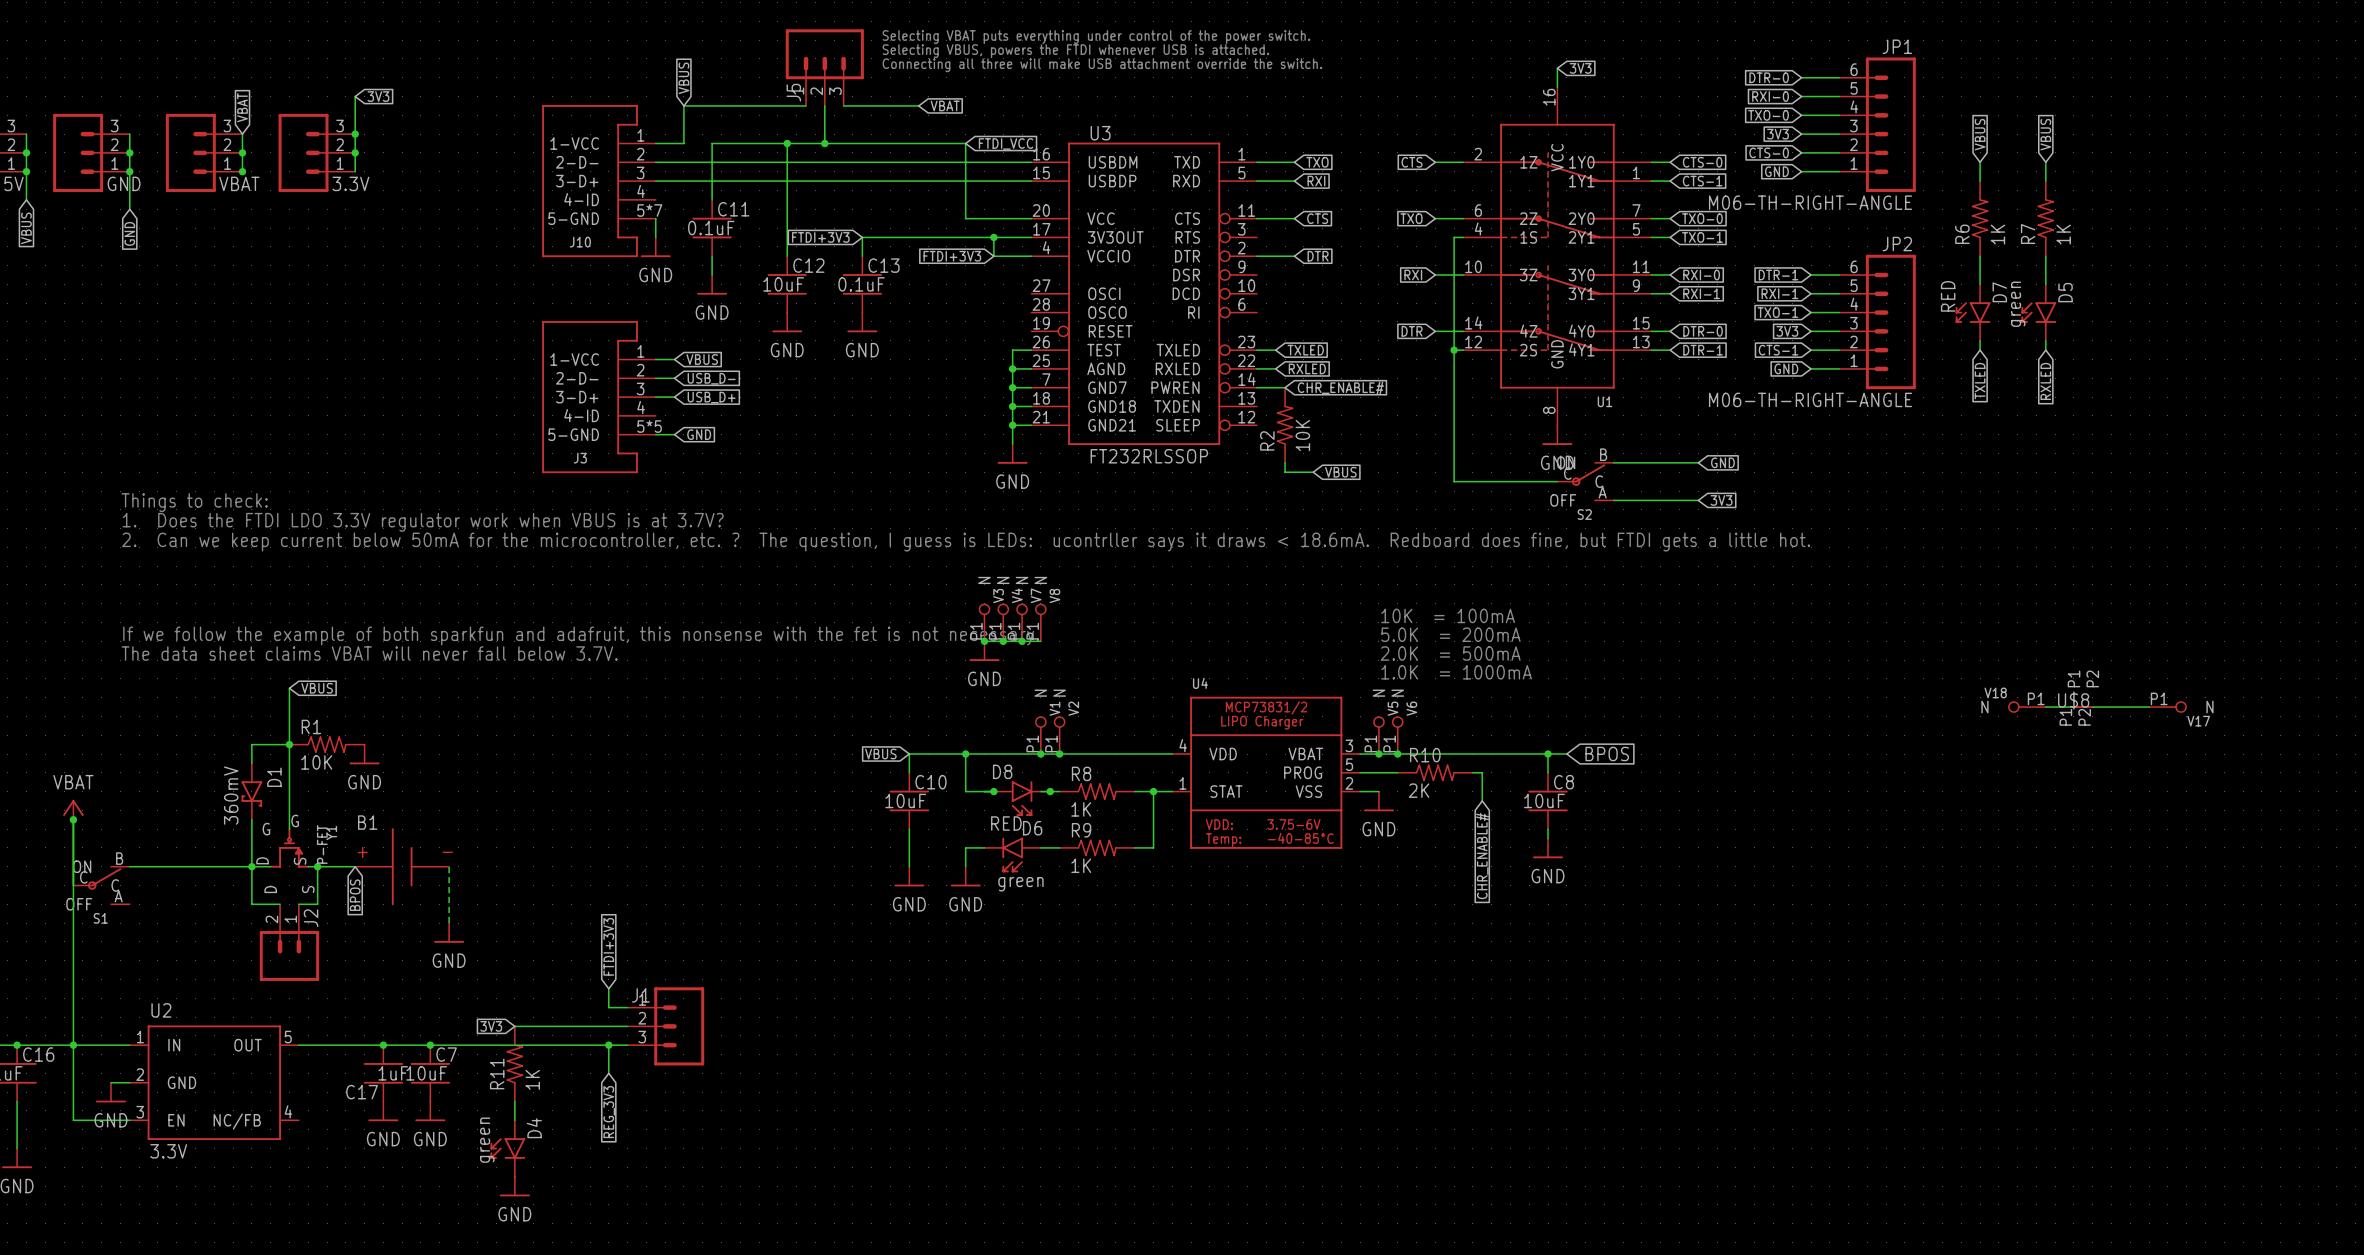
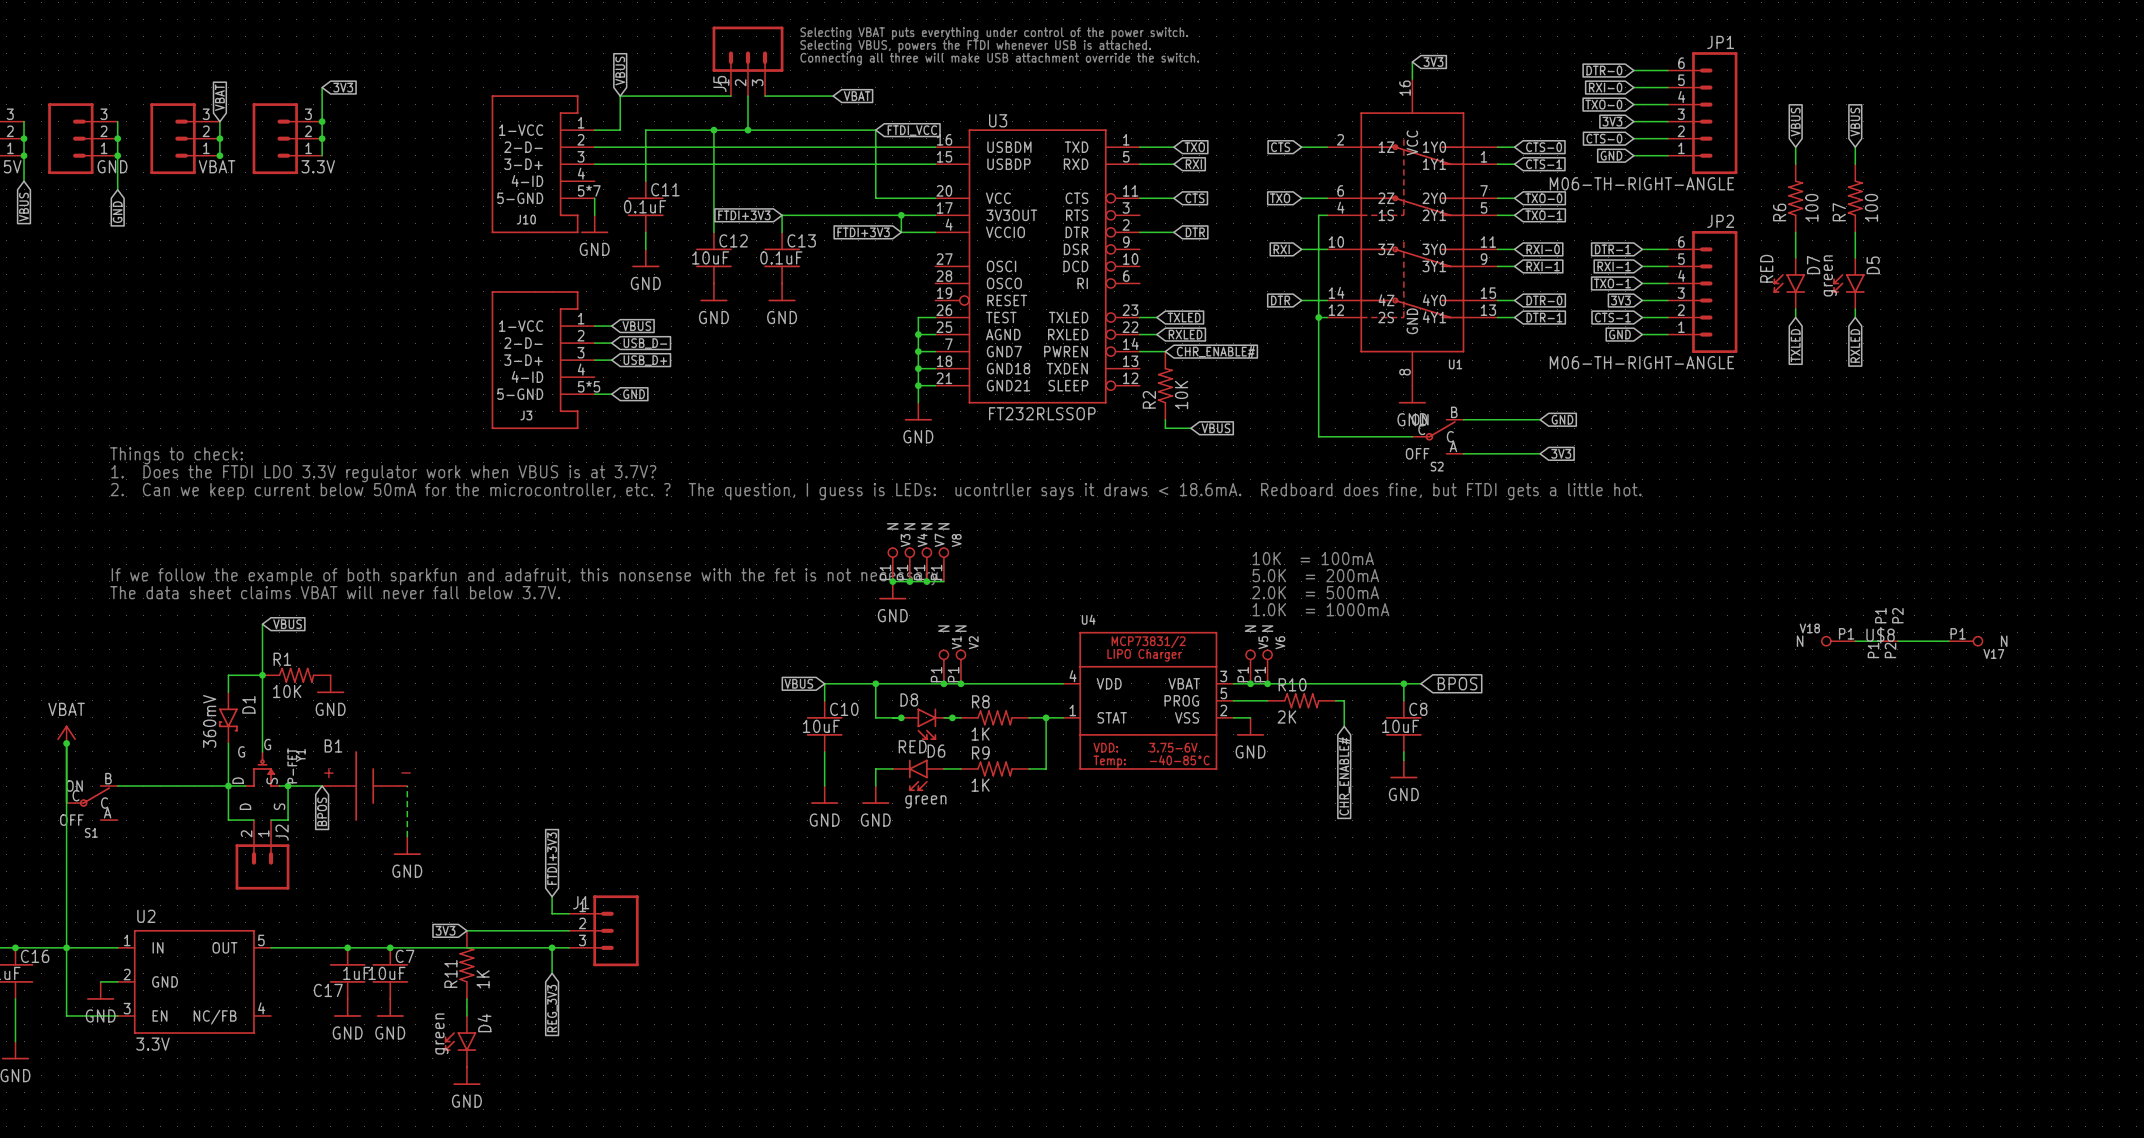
R6 value: 1K (1997, 234) -> 100 (1811, 207)
R7 value: 1K (2063, 234) -> 100 (1871, 207)

